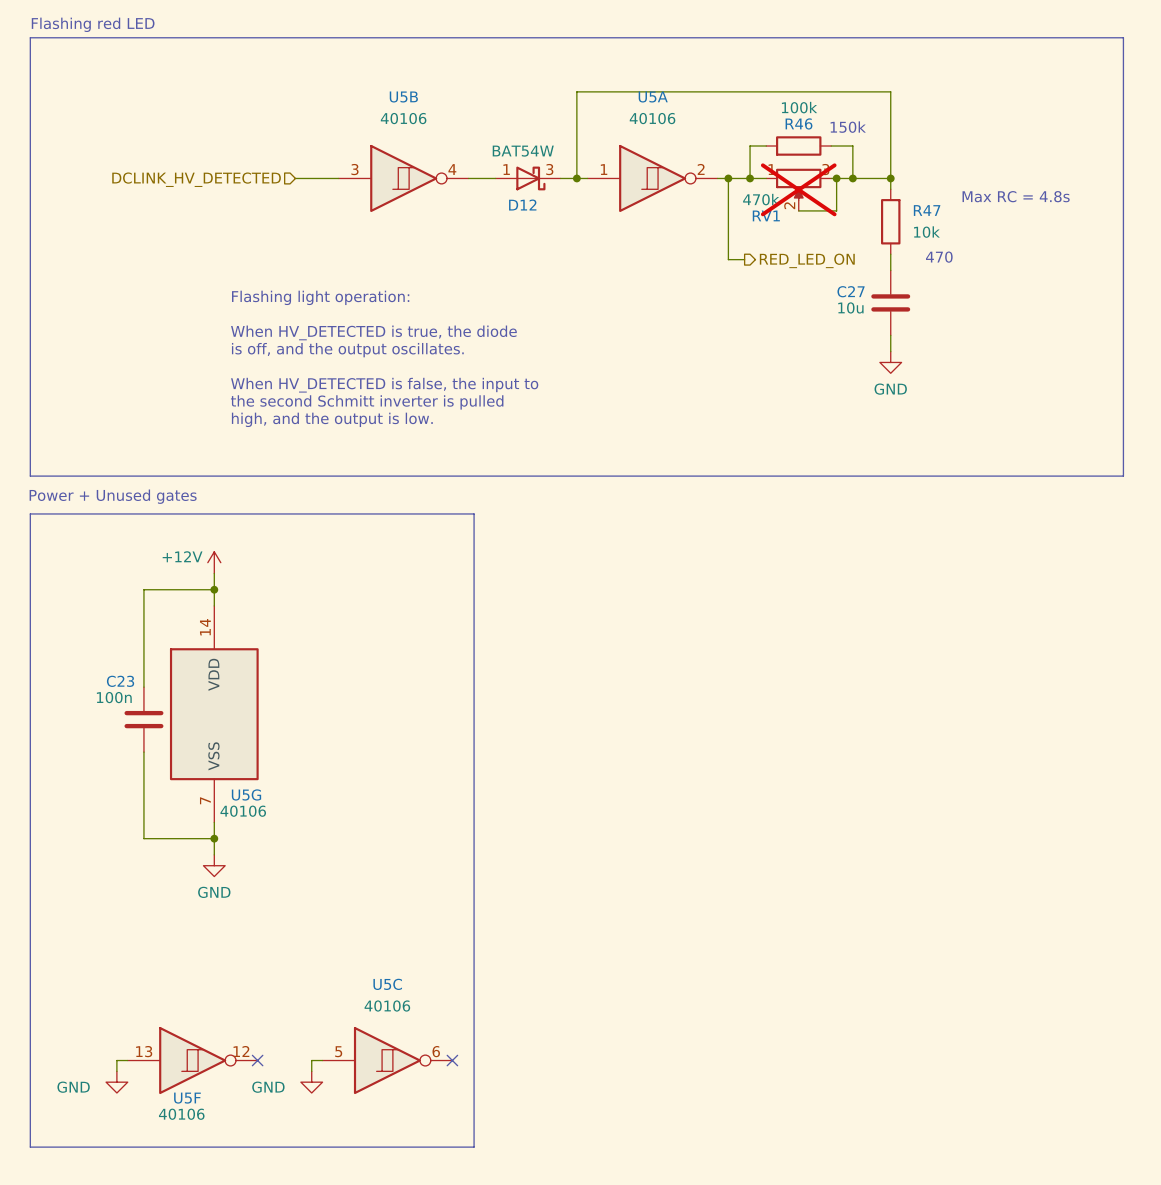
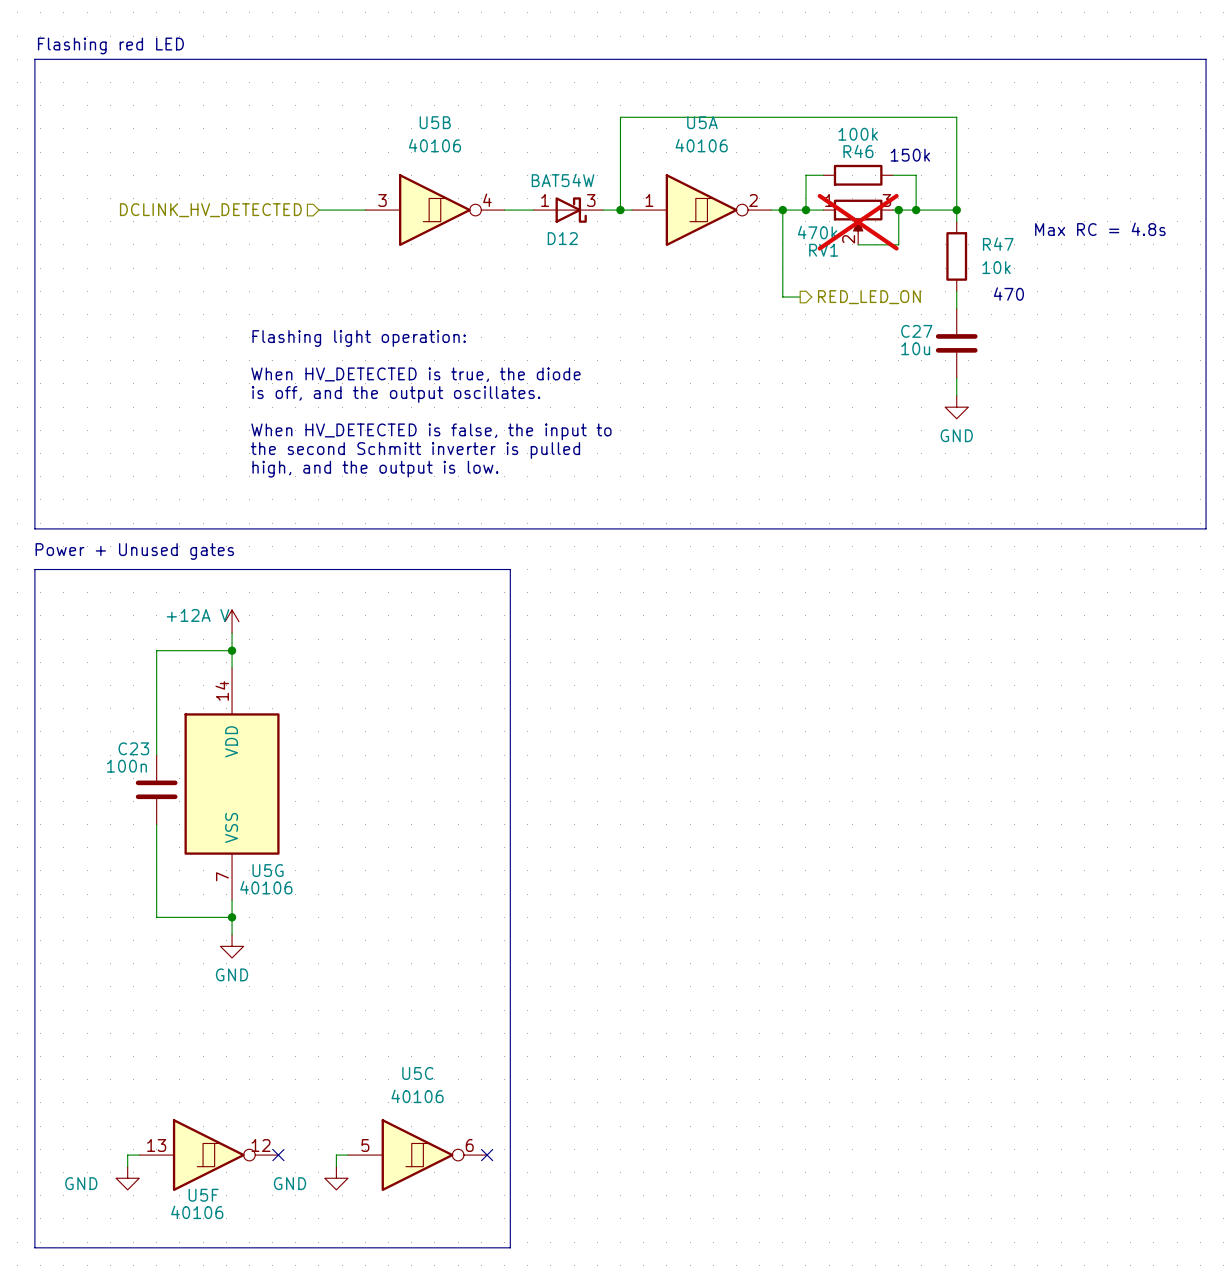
power symbol: +12V (214, 562) -> +12A V (232, 621)

